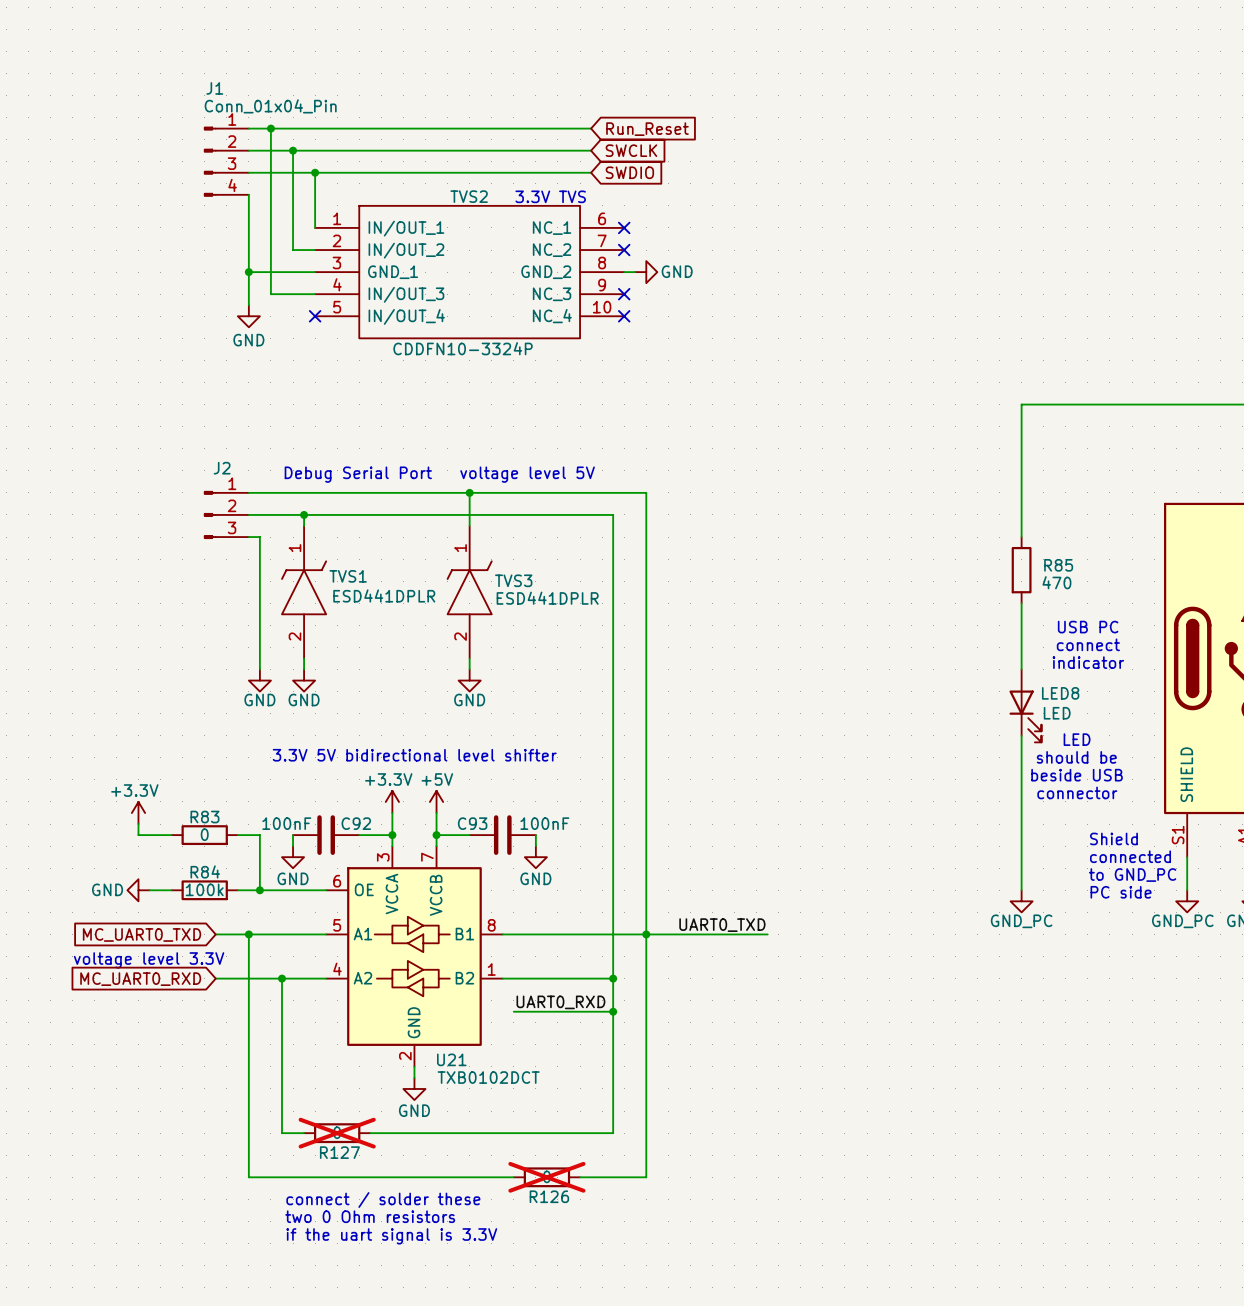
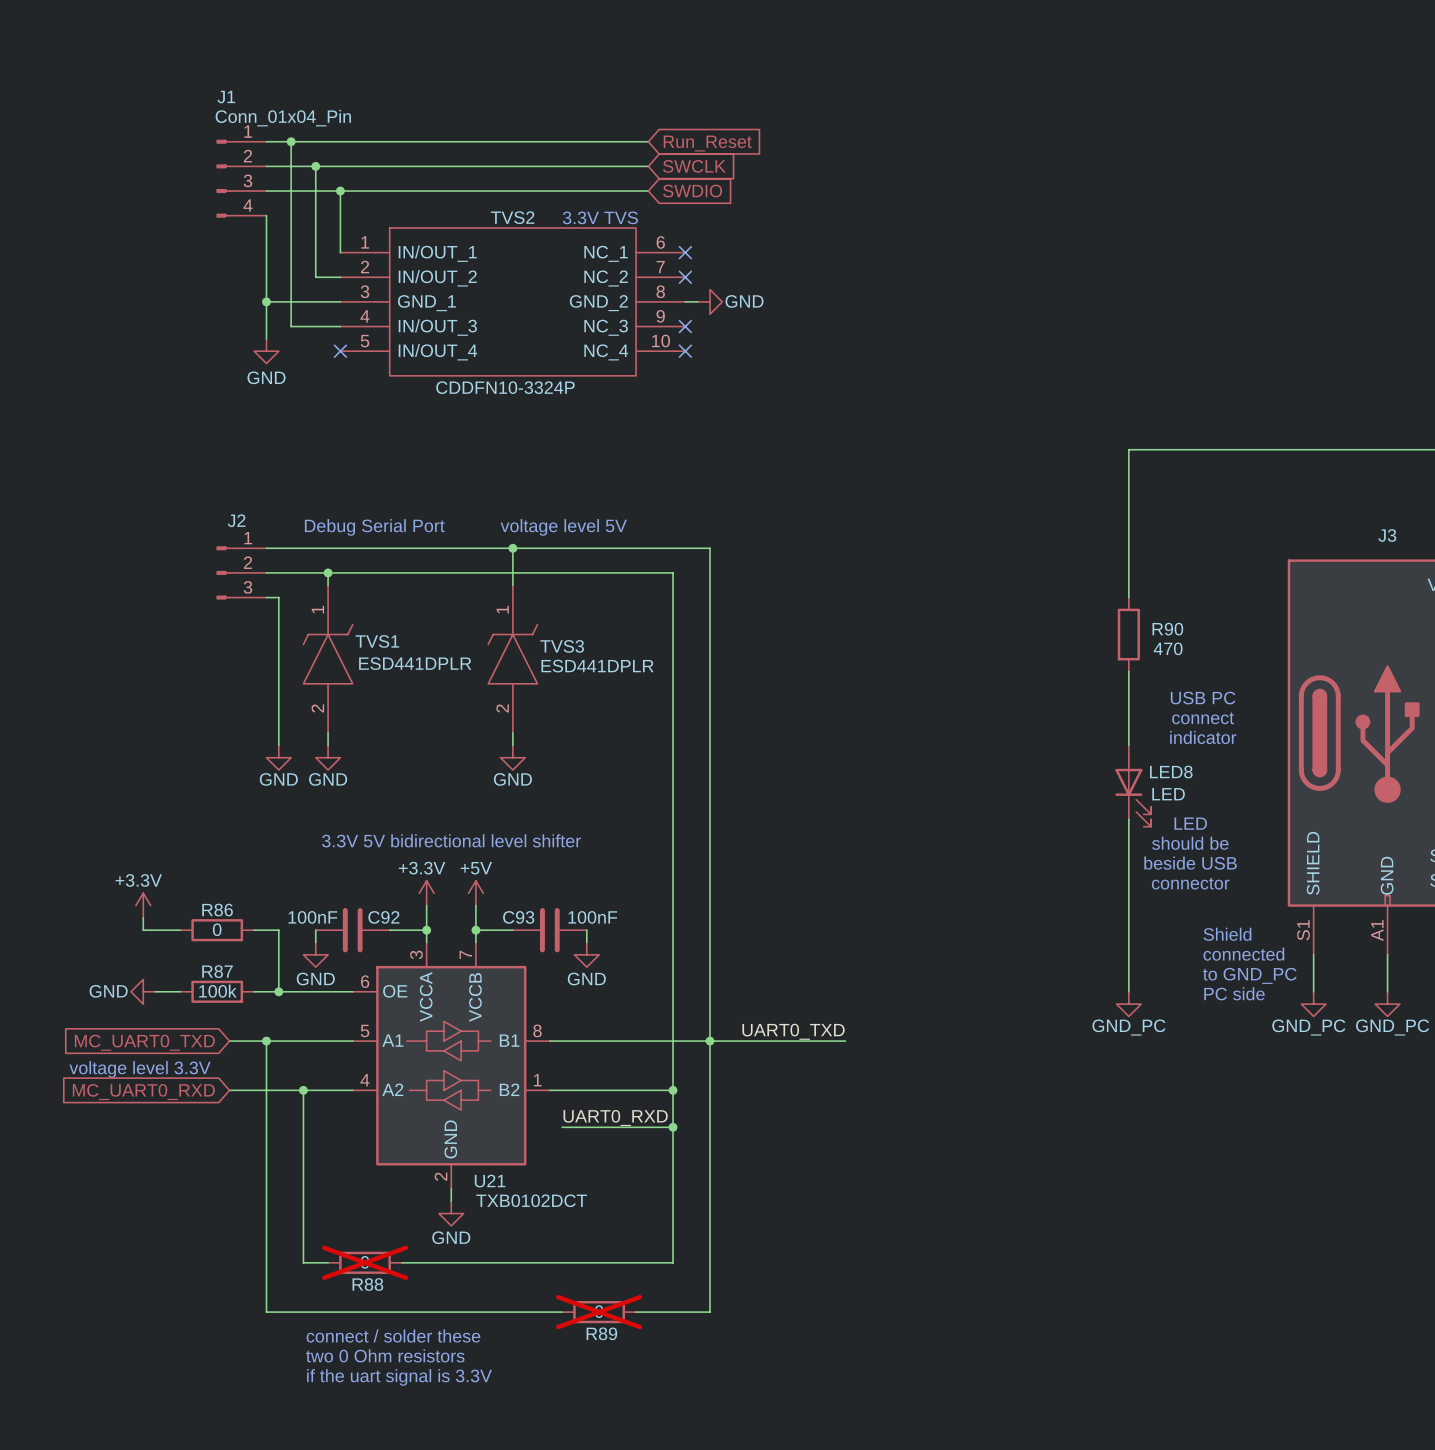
R85 name: R85 (1058, 565) -> R90 (1167, 629)
R83 name: R83 (204, 817) -> R86 (217, 910)
R84 name: R84 (205, 871) -> R87 (217, 971)
R127 name: R127 (339, 1152) -> R88 (367, 1284)
R126 name: R126 (549, 1196) -> R89 (601, 1333)

